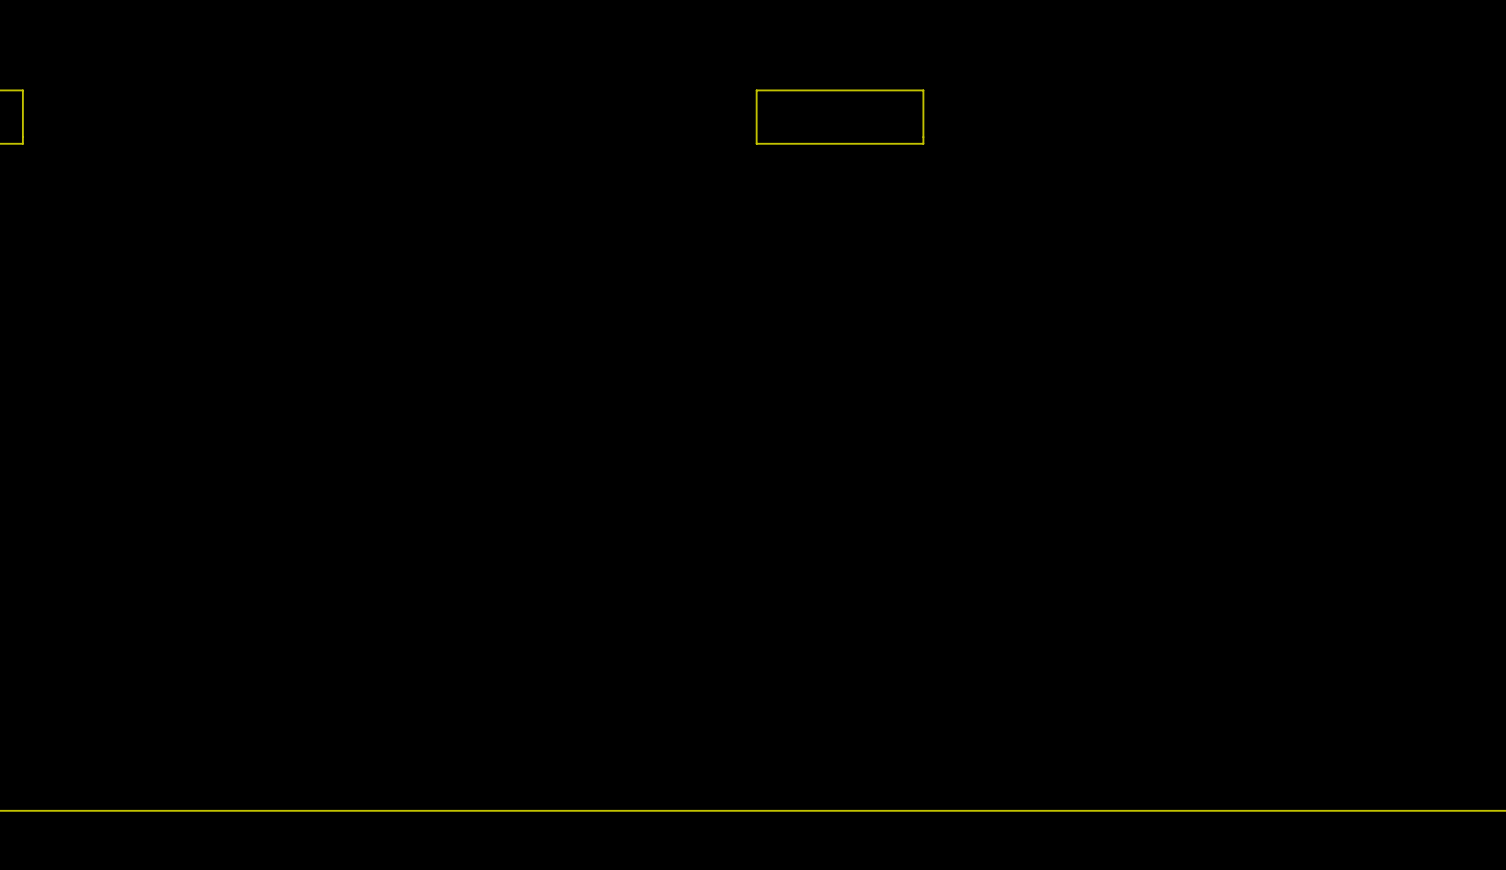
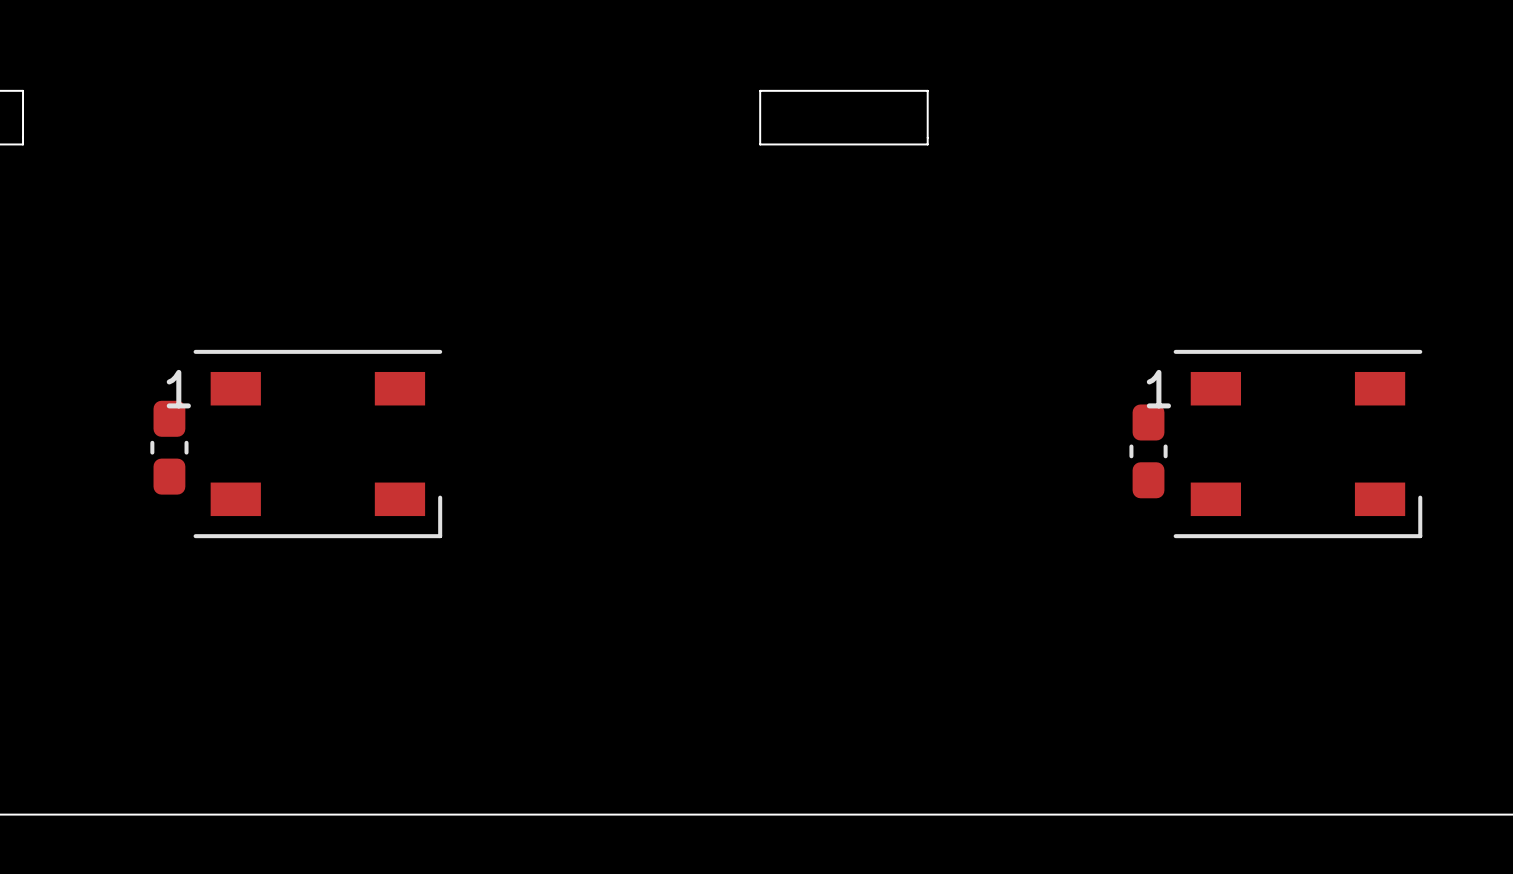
part: none -> (317, 444)
part: none -> (1297, 444)
part: none -> (169, 447)
part: none -> (1148, 451)

